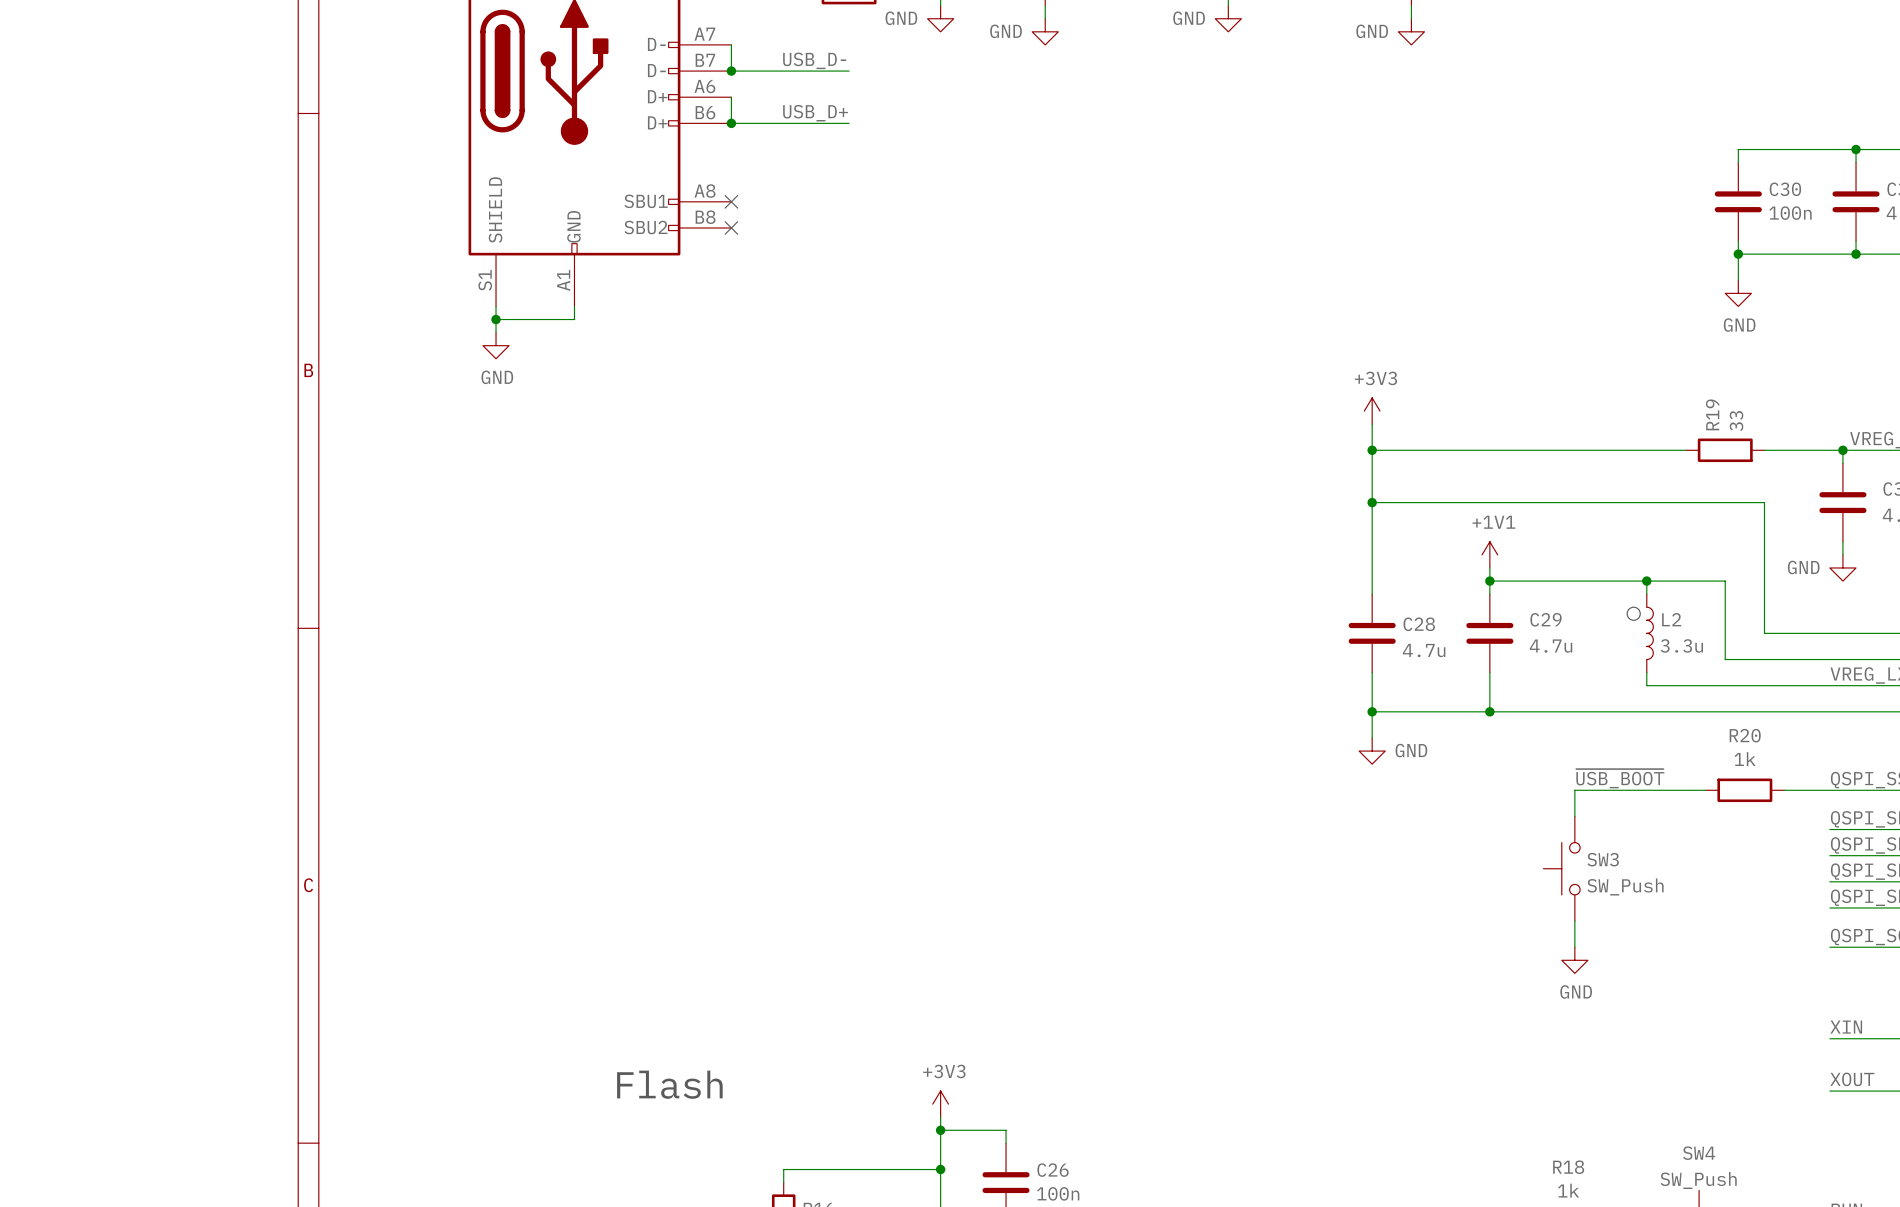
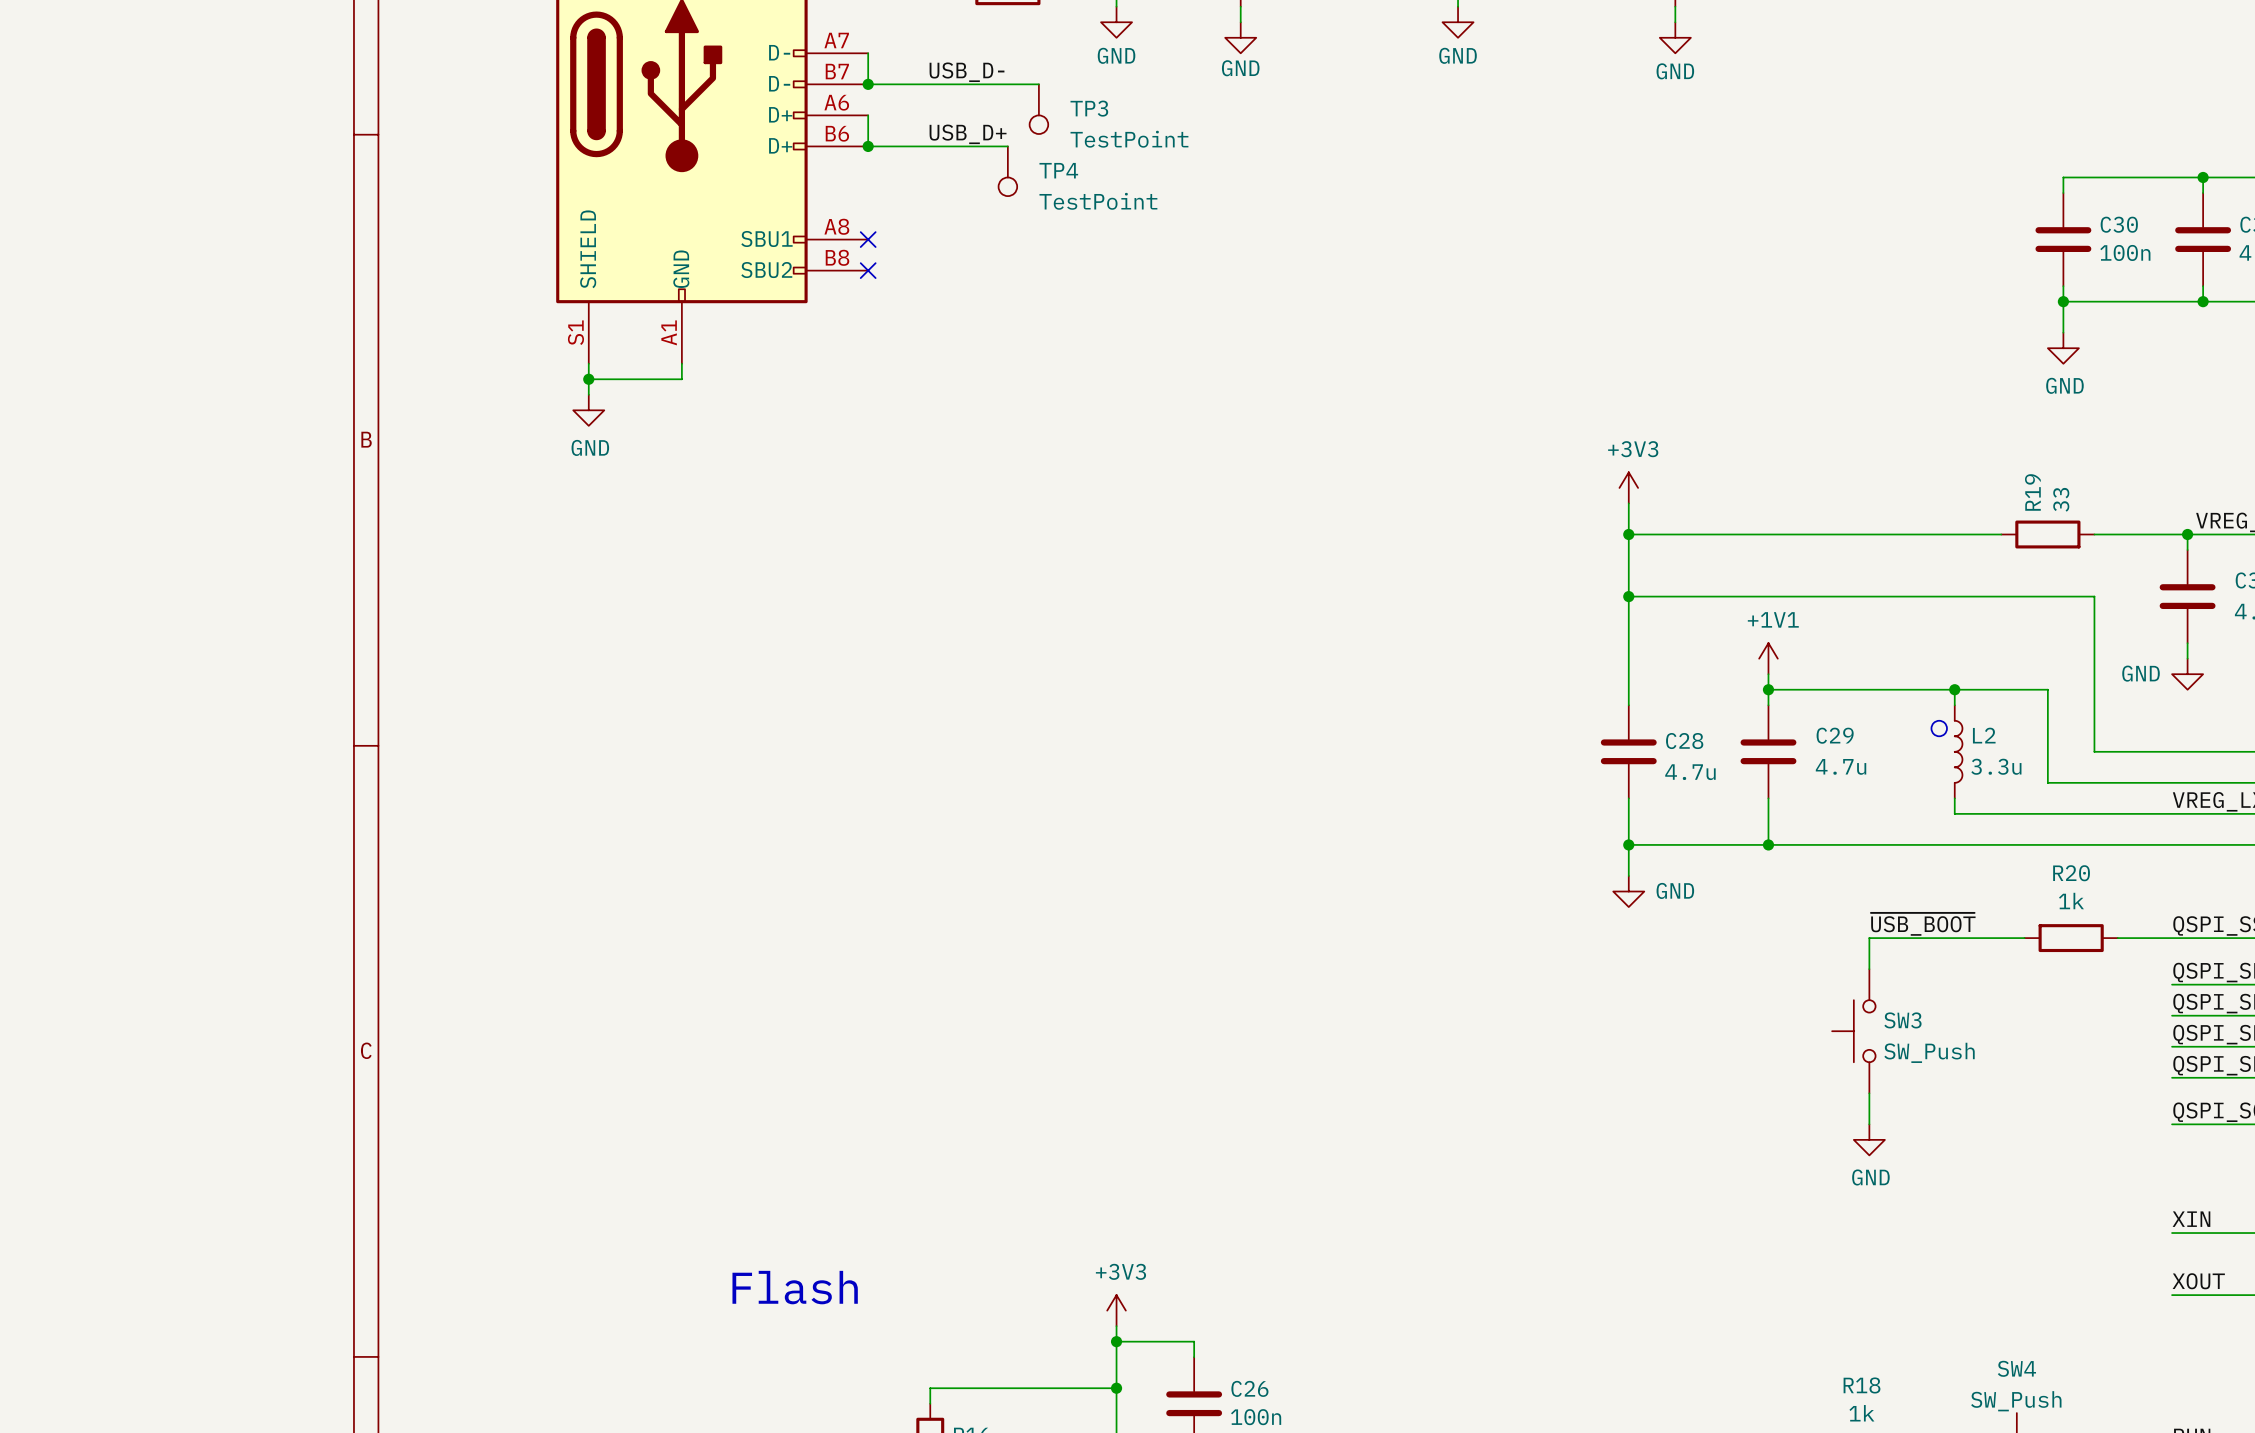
power symbol text position: GND (901, 18) -> GND (1116, 55)
power symbol text position: GND (1189, 18) -> GND (1458, 55)
power symbol text position: GND (1006, 31) -> GND (1240, 68)
power symbol text position: GND (1372, 31) -> GND (1675, 71)
wire: none -> (1007, 84) (1038, 84)
TP3: none -> TestPoint (1038, 109)
TP4: none -> TestPoint (1007, 171)

